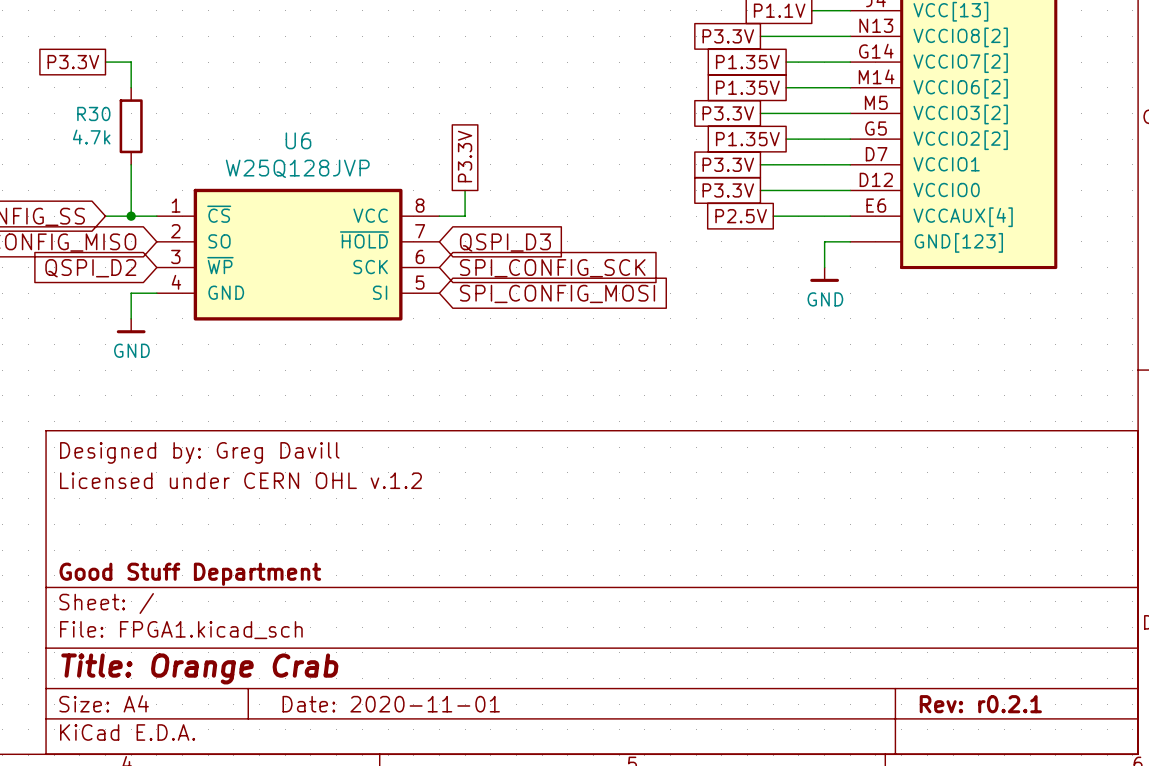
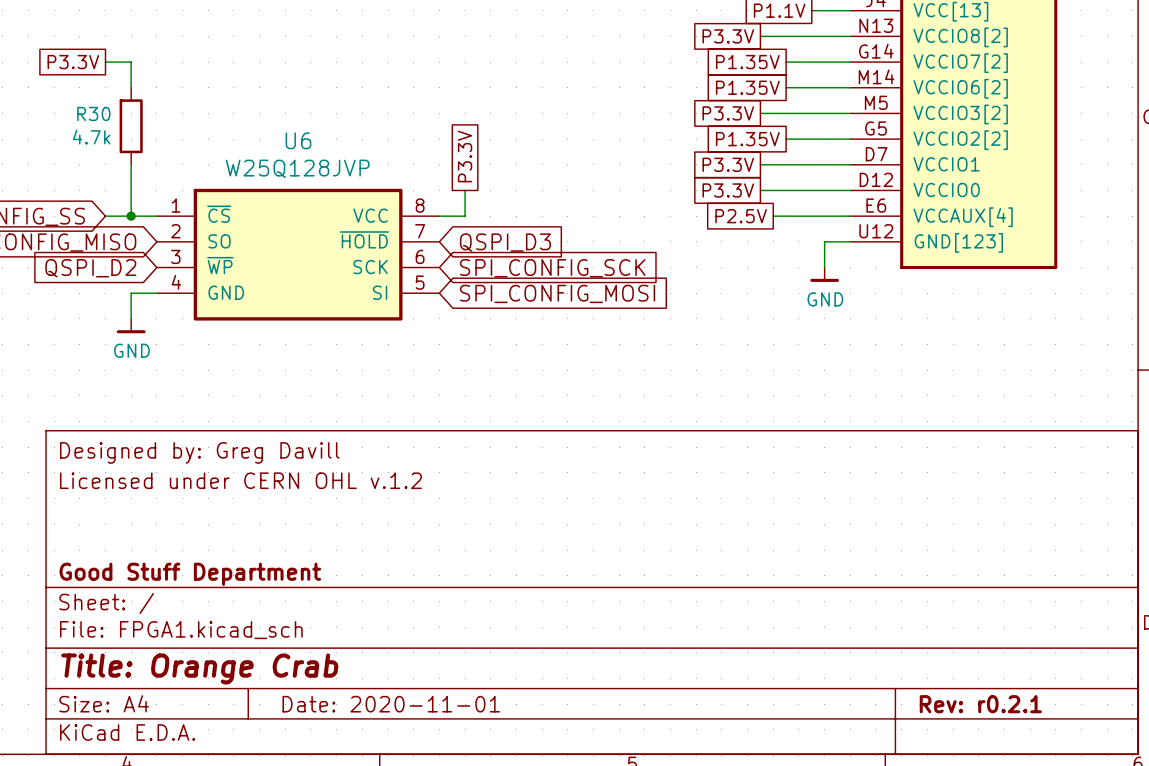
part pin number: none -> U12 (876, 231)

